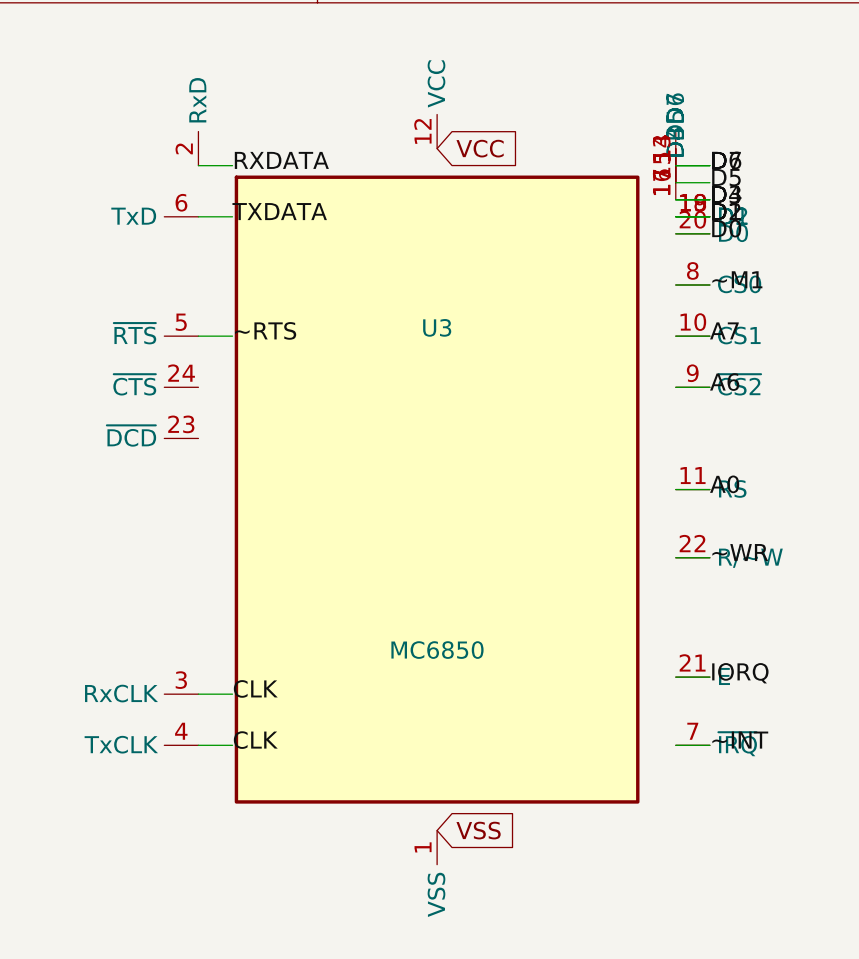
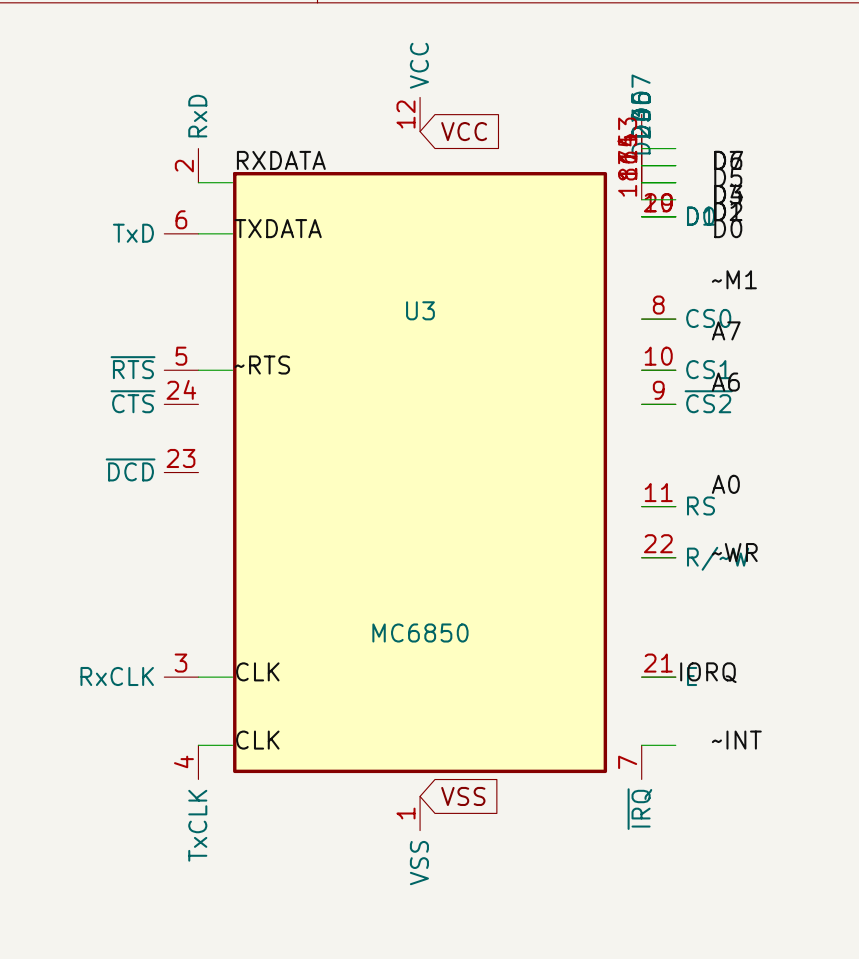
U3 symbol: [164, 114, 710, 865] -> [164, 97, 676, 831]
global label position: VCC (480, 148) -> VCC (464, 131)
wire: (198, 165) (232, 165) -> (198, 182) (232, 182)
wire: (675, 165) (709, 165) -> (675, 165) (641, 165)
wire: (675, 182) (709, 182) -> (675, 182) (641, 182)
wire: (675, 199) (709, 199) -> (675, 199) (641, 199)
label position: TXDATA (279, 211) -> TXDATA (278, 228)
wire: (198, 216) (232, 216) -> (198, 233) (232, 233)
wire: (675, 216) (709, 216) -> (675, 216) (641, 216)
wire: (675, 233) (709, 233) -> (641, 148) (675, 148)
wire: (675, 285) (709, 285) -> (641, 404) (675, 404)
label position: ~RTS (265, 330) -> ~RTS (262, 365)
wire: (198, 336) (232, 336) -> (198, 370) (232, 370)
wire: (675, 336) (709, 336) -> (641, 319) (675, 319)
wire: (675, 387) (709, 387) -> (641, 370) (675, 370)
wire: (675, 489) (709, 489) -> (641, 506) (675, 506)
wire: (675, 557) (709, 557) -> (675, 557) (641, 557)
label position: IORQ (740, 673) -> IORQ (708, 672)
wire: (675, 677) (709, 677) -> (675, 677) (641, 677)
label position: CLK (255, 688) -> CLK (257, 671)
wire: (198, 694) (232, 694) -> (198, 677) (232, 677)
wire: (675, 745) (709, 745) -> (675, 745) (641, 745)
global label position: VSS (478, 830) -> VSS (463, 796)

